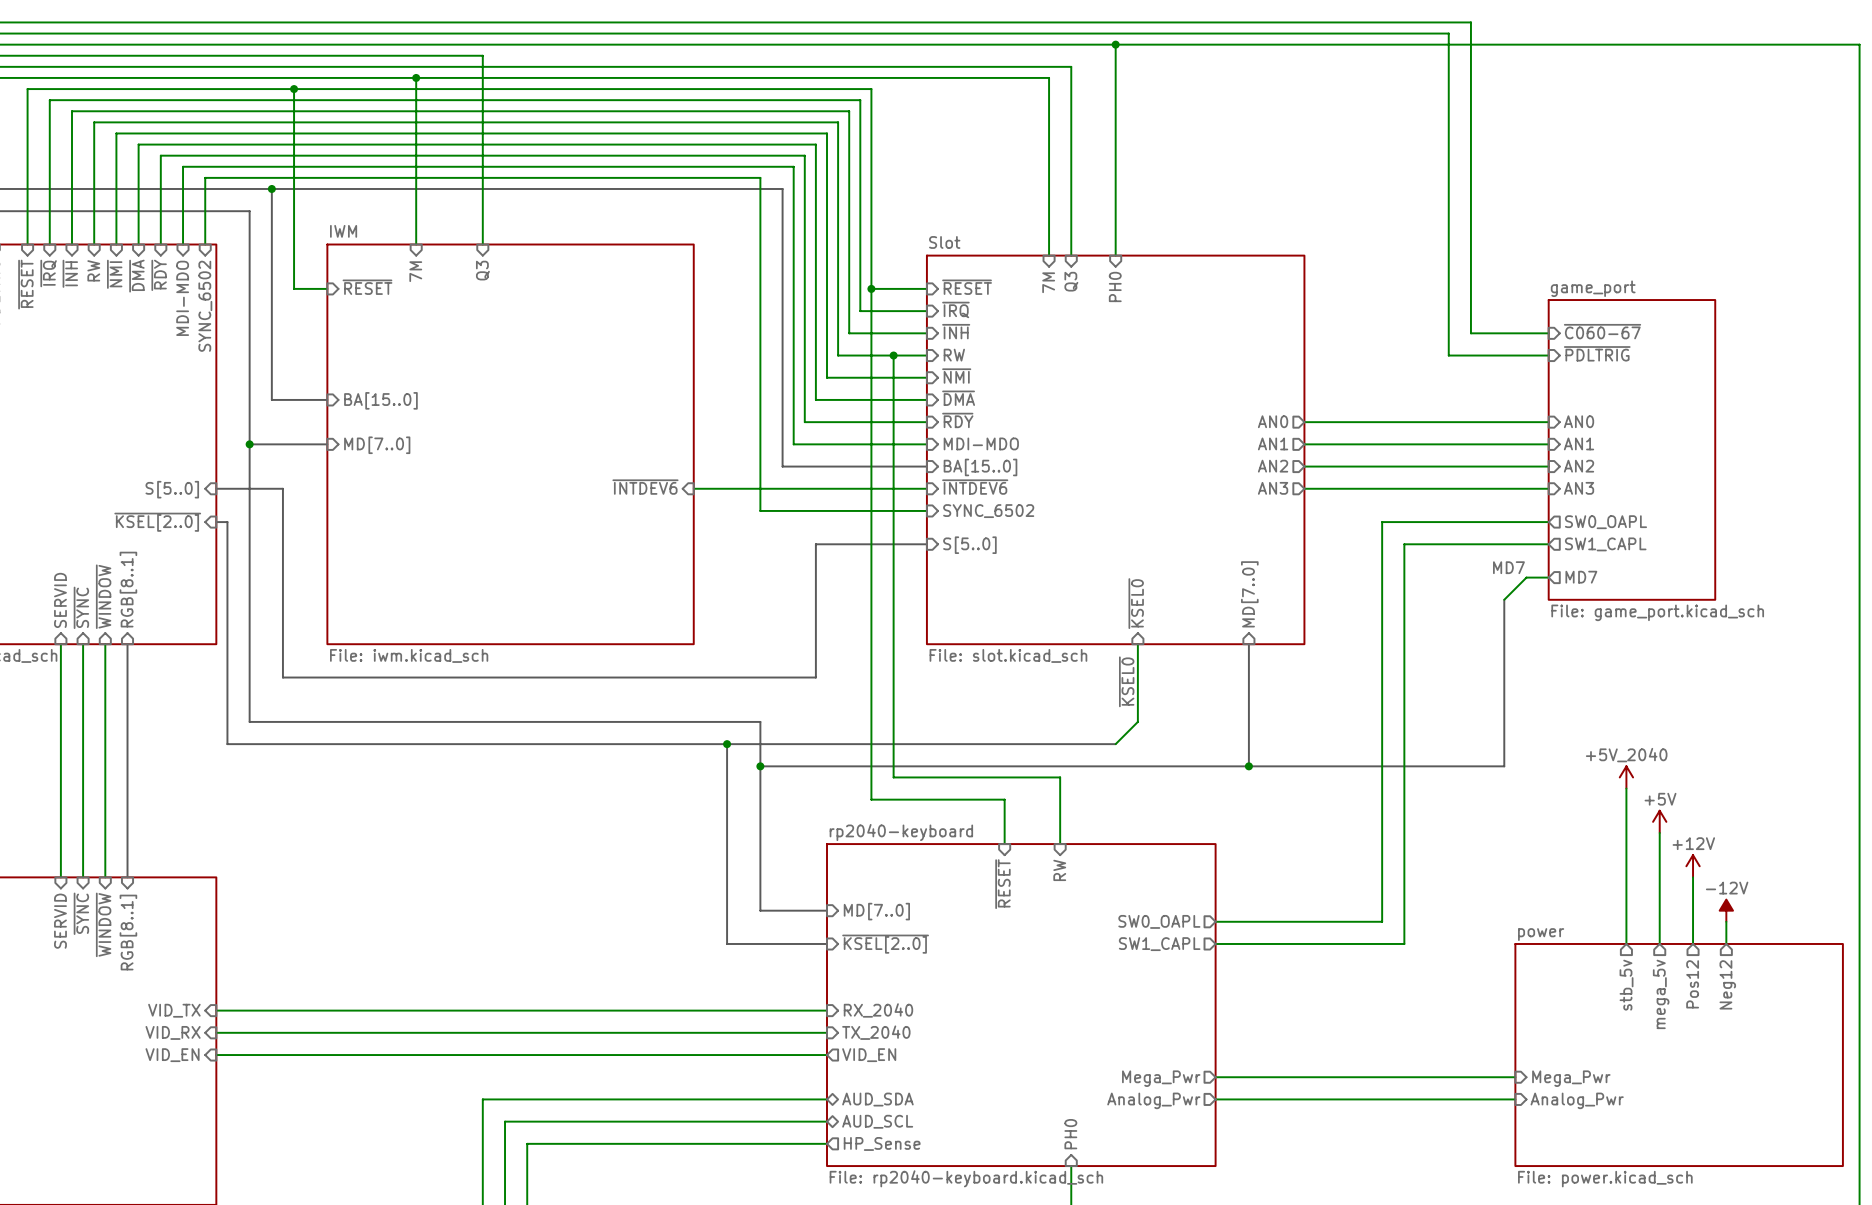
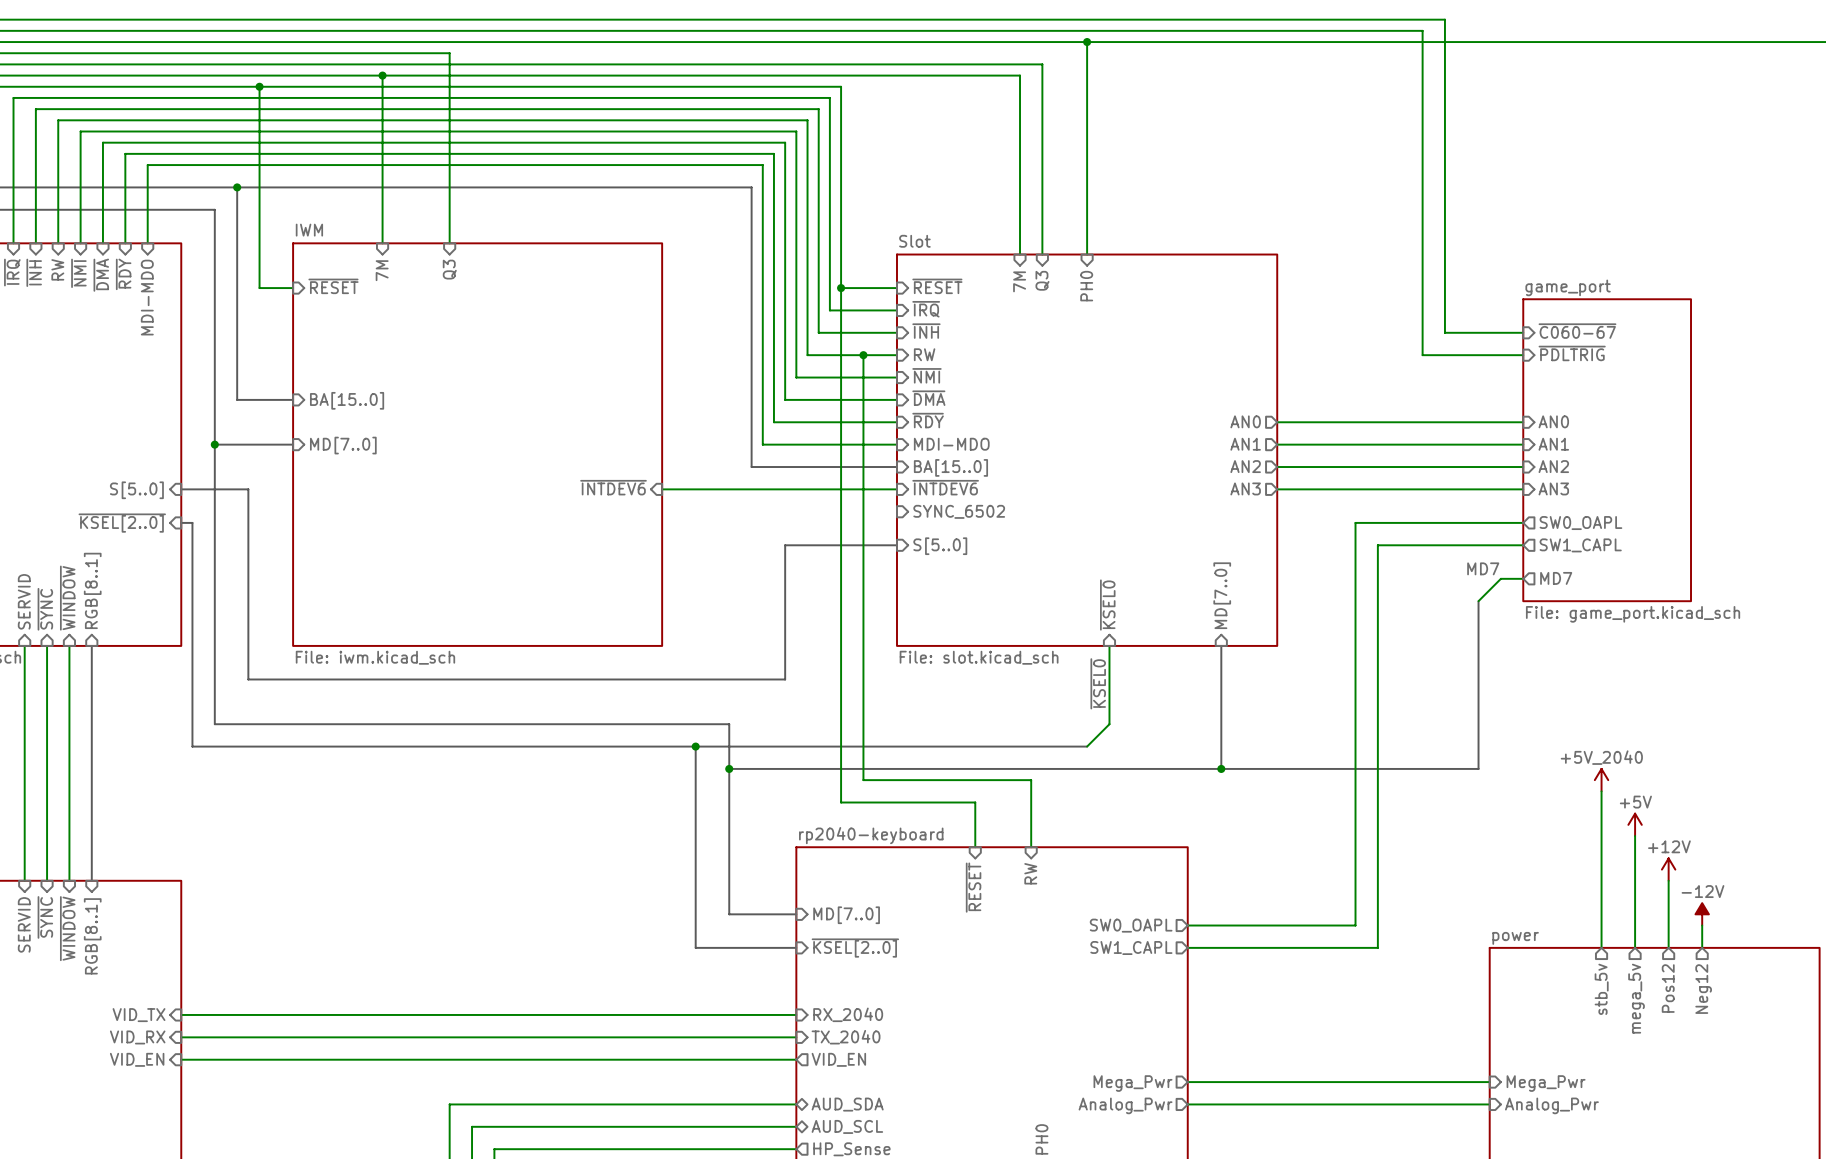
wire: (205, 244) (205, 177) (760, 177) (760, 510) (926, 510) -> none
sheet pin: SYNC_6502 (205, 306) -> none

